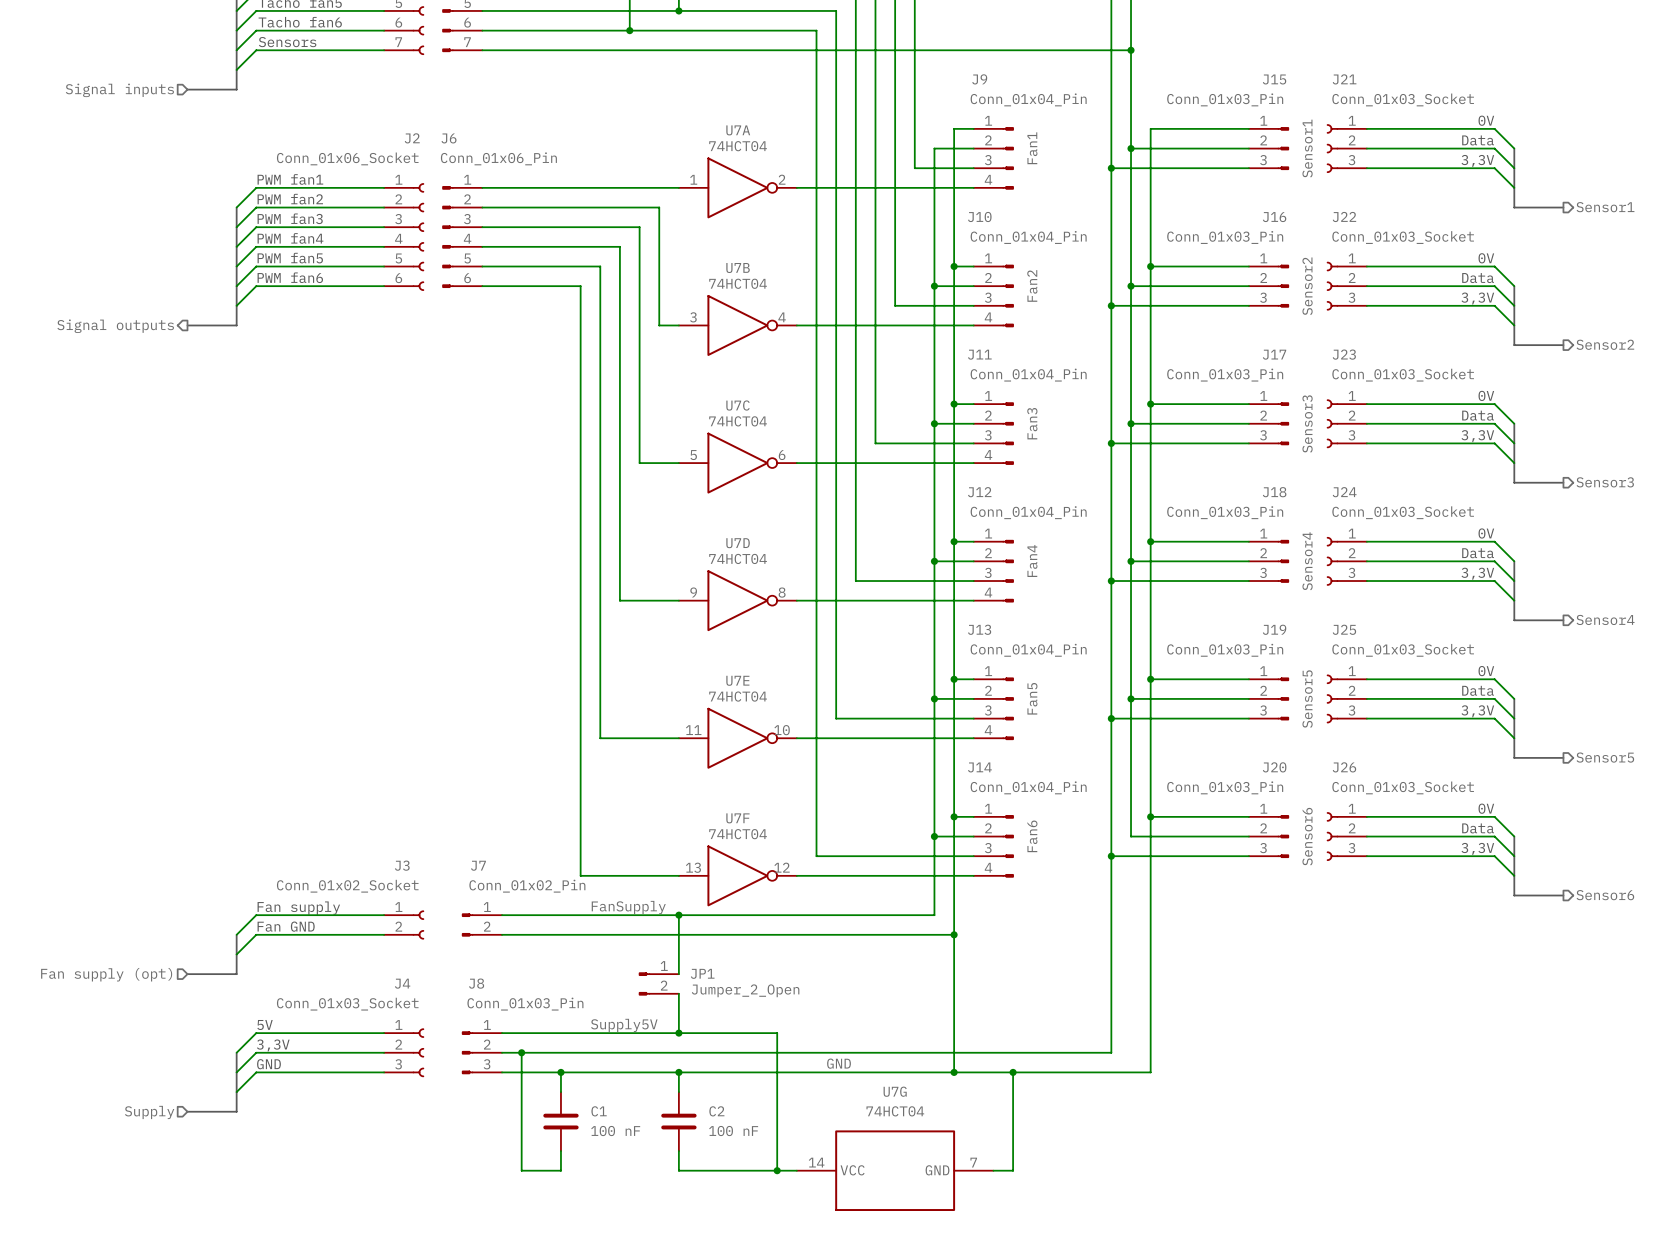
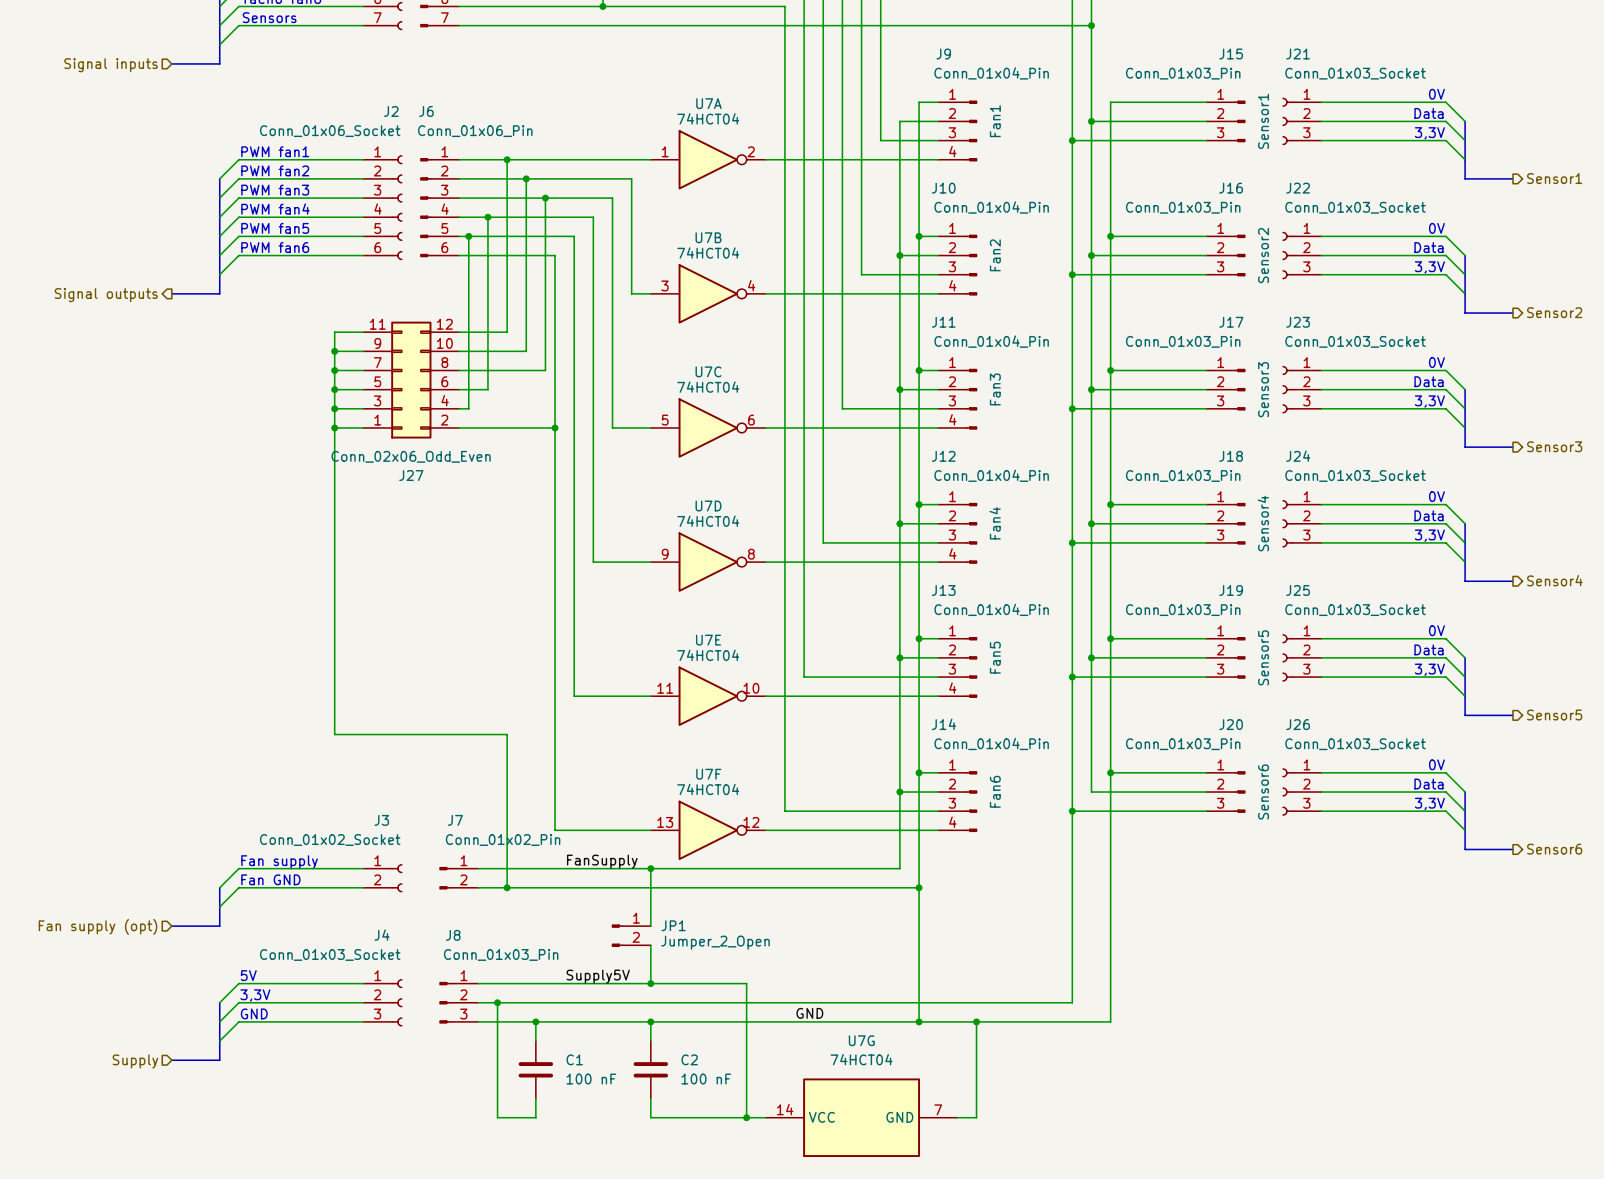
wire: none -> (507, 159) (507, 332) (459, 332)
junction: none -> (507, 159)
wire: none -> (526, 178) (526, 351) (459, 351)
junction: none -> (526, 178)
wire: none -> (545, 198) (545, 370) (459, 370)
junction: none -> (545, 198)
wire: none -> (487, 217) (487, 389) (459, 389)
junction: none -> (487, 217)
wire: none -> (468, 236) (468, 408) (459, 408)
junction: none -> (468, 236)
wire: none -> (363, 332) (334, 332) (334, 734) (507, 734) (507, 887)
wire: none -> (334, 351) (363, 351)
junction: none -> (334, 351)
wire: none -> (334, 370) (363, 370)
junction: none -> (334, 370)
J27: none -> Conn_02x06_Odd_Even (411, 380)
wire: none -> (334, 389) (363, 389)
junction: none -> (334, 389)
wire: none -> (334, 408) (363, 408)
junction: none -> (334, 408)
wire: none -> (334, 427) (363, 427)
junction: none -> (334, 427)
wire: none -> (459, 427) (555, 427)
junction: none -> (555, 427)
junction: none -> (507, 887)

